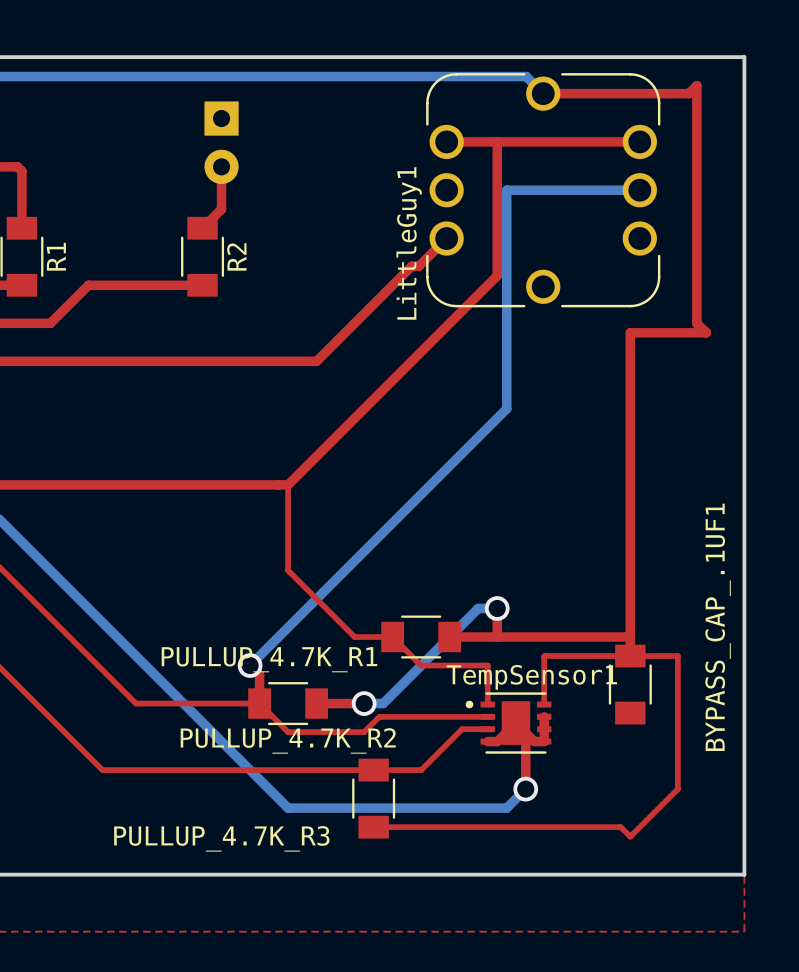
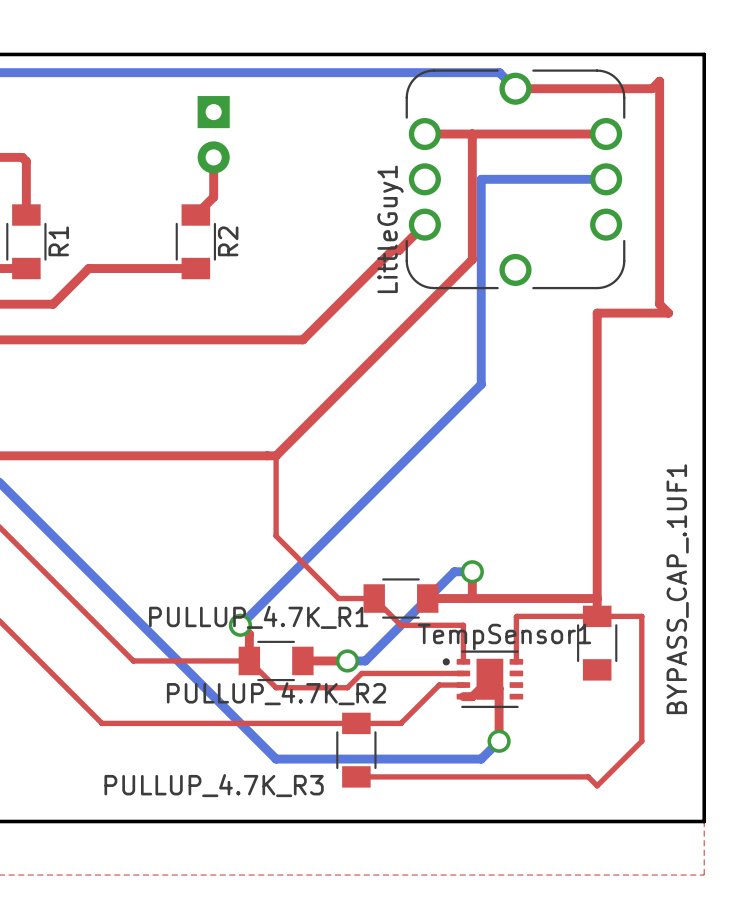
top track: (544, 716) (544, 741) (534, 741) (525, 732) -> none

